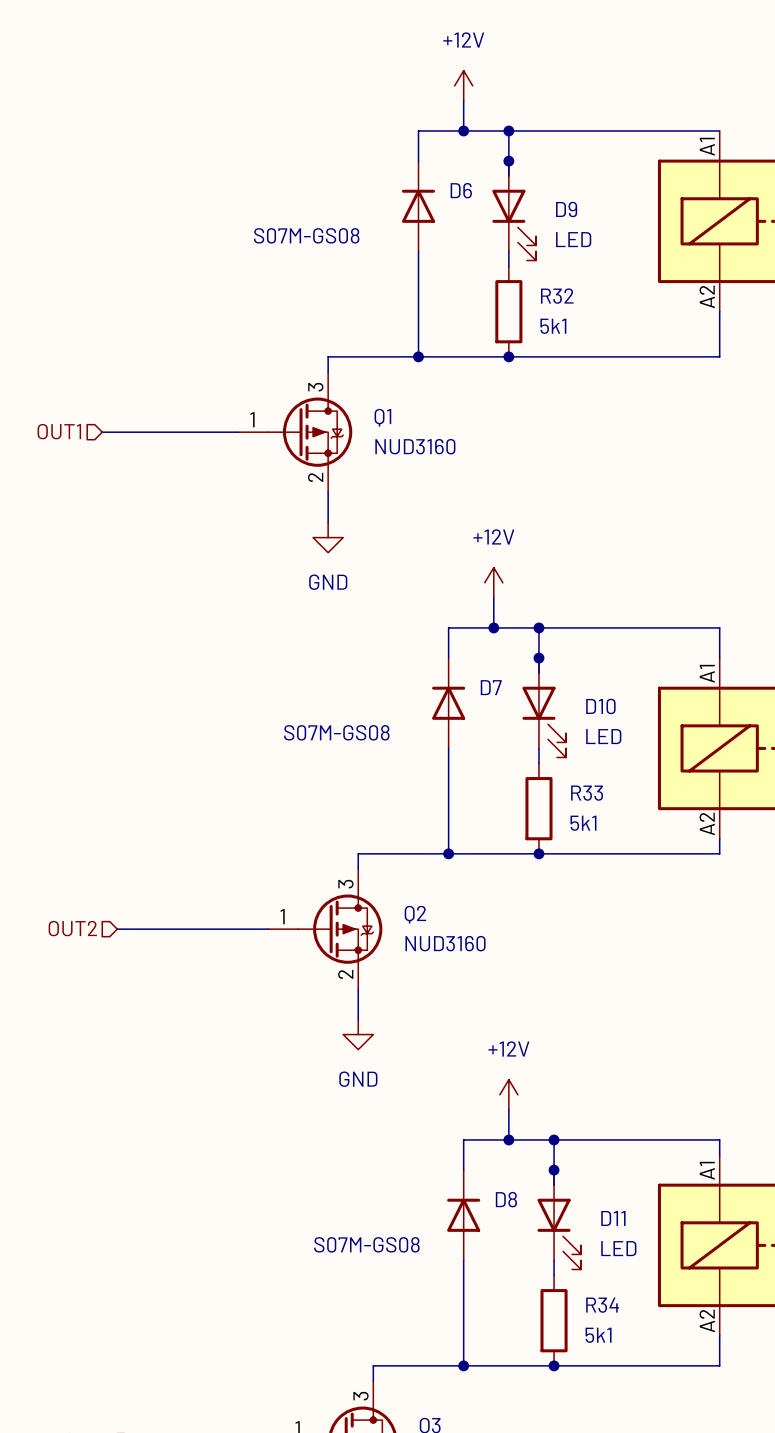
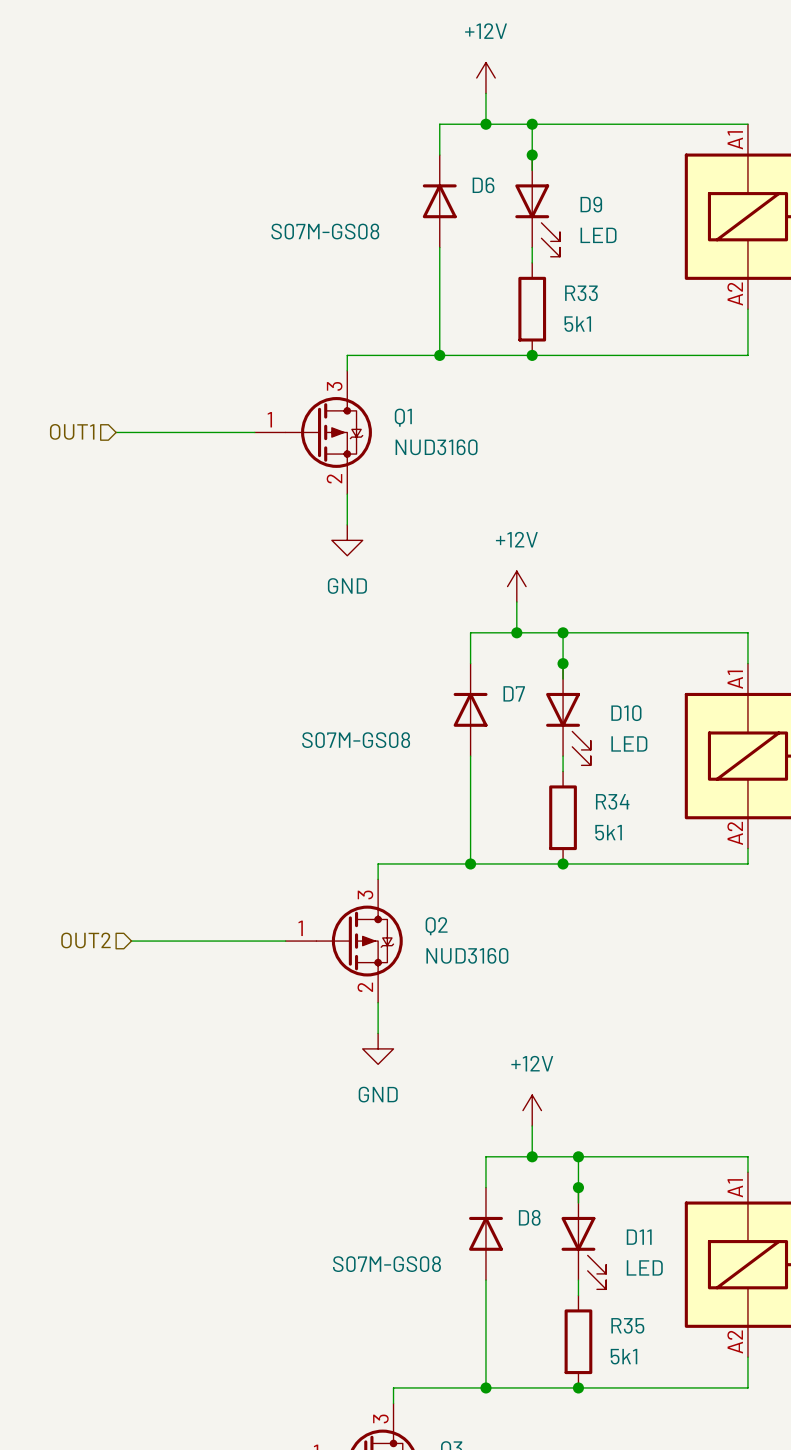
R32 name: R32 (557, 296) -> R33 (581, 293)
R33 name: R33 (587, 793) -> R34 (612, 801)
R34 name: R34 (602, 1305) -> R35 (627, 1325)

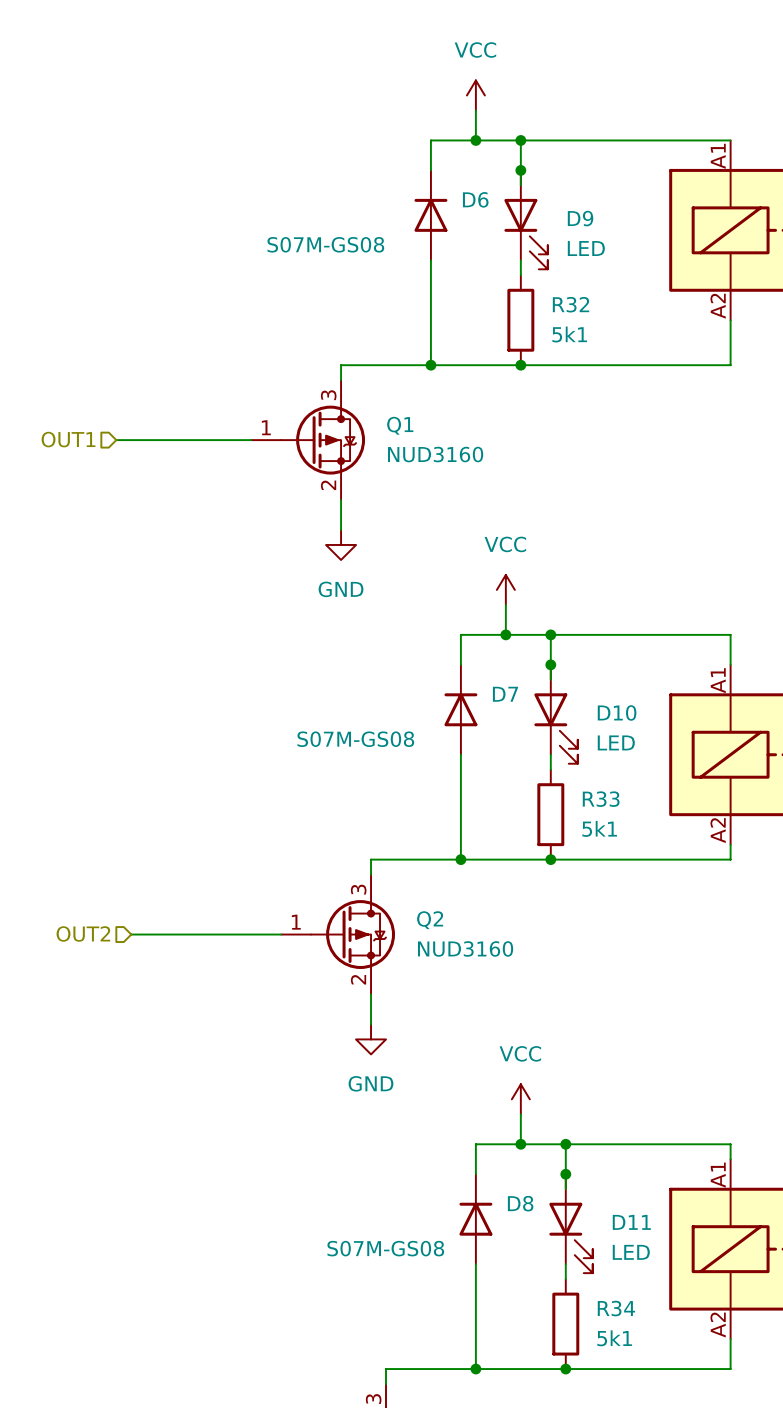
power symbol: +12V (485, 78) -> VCC (475, 95)
R33 name: R33 (581, 293) -> R32 (571, 304)
power symbol: +12V (516, 586) -> VCC (505, 589)
R34 name: R34 (612, 801) -> R33 (601, 799)
power symbol: +12V (532, 1110) -> VCC (520, 1099)
R35 name: R35 (627, 1325) -> R34 (616, 1308)

